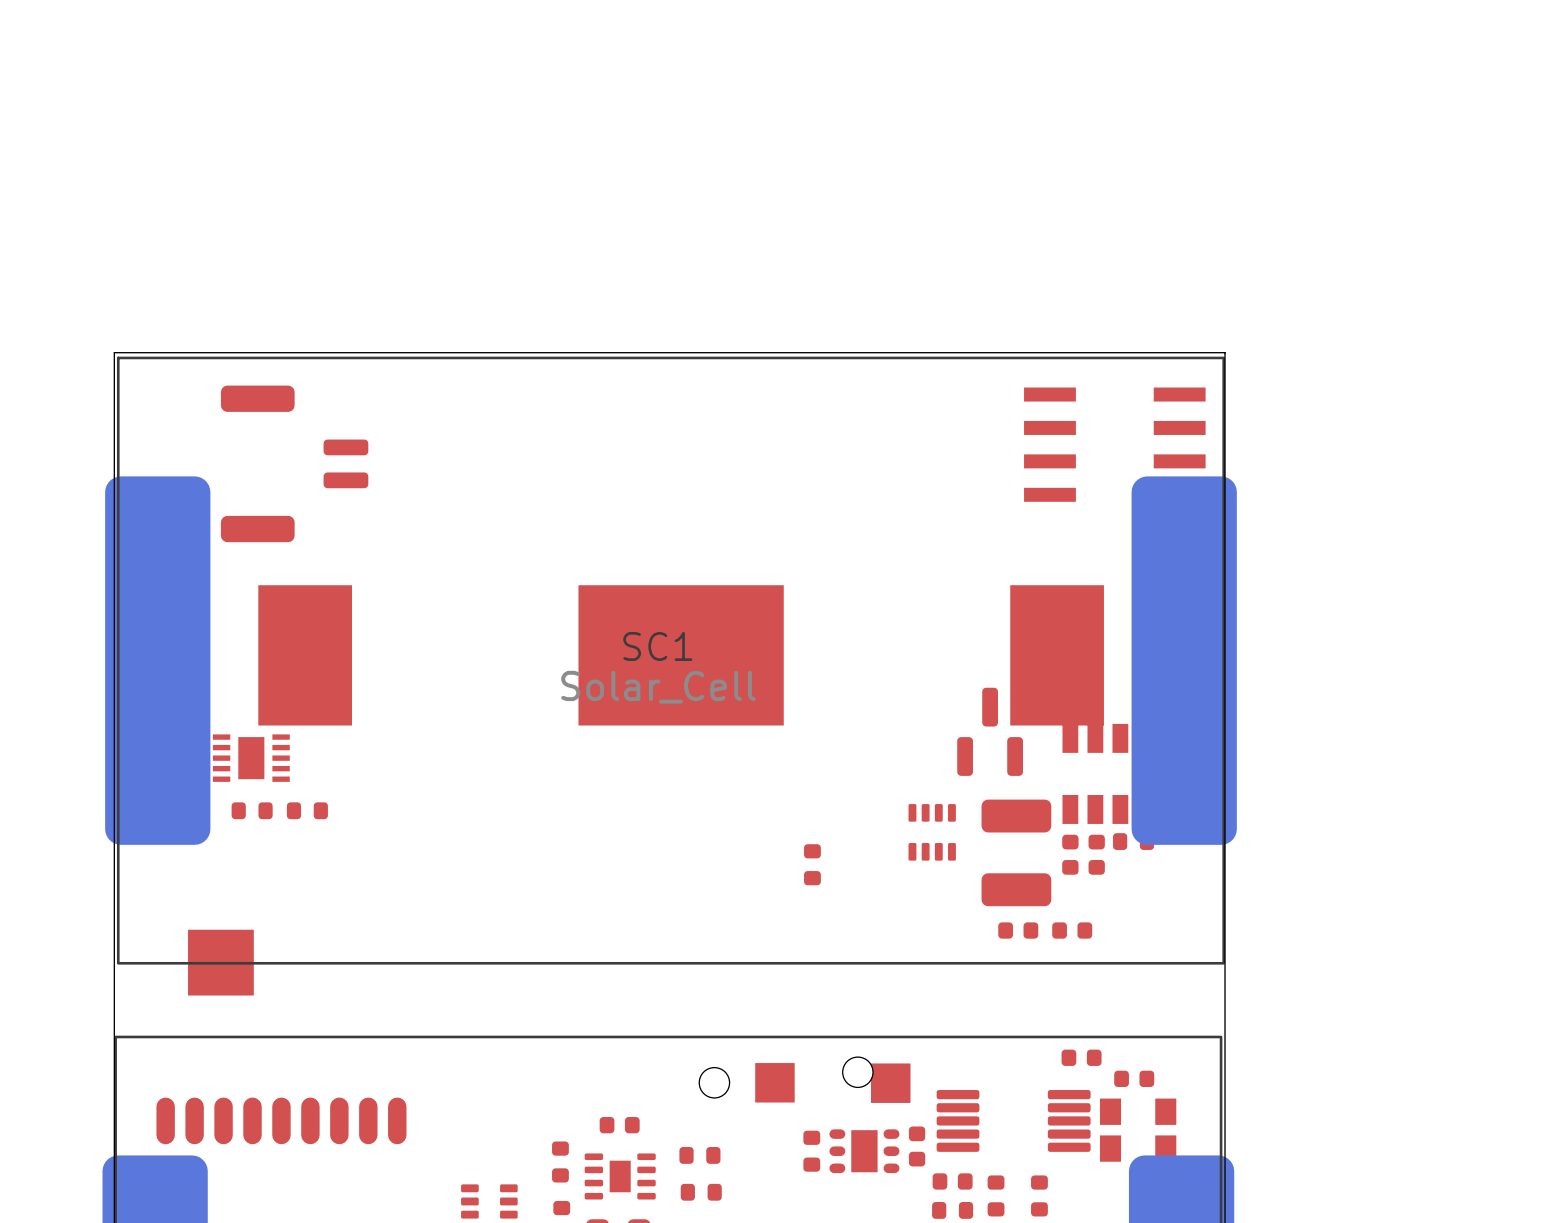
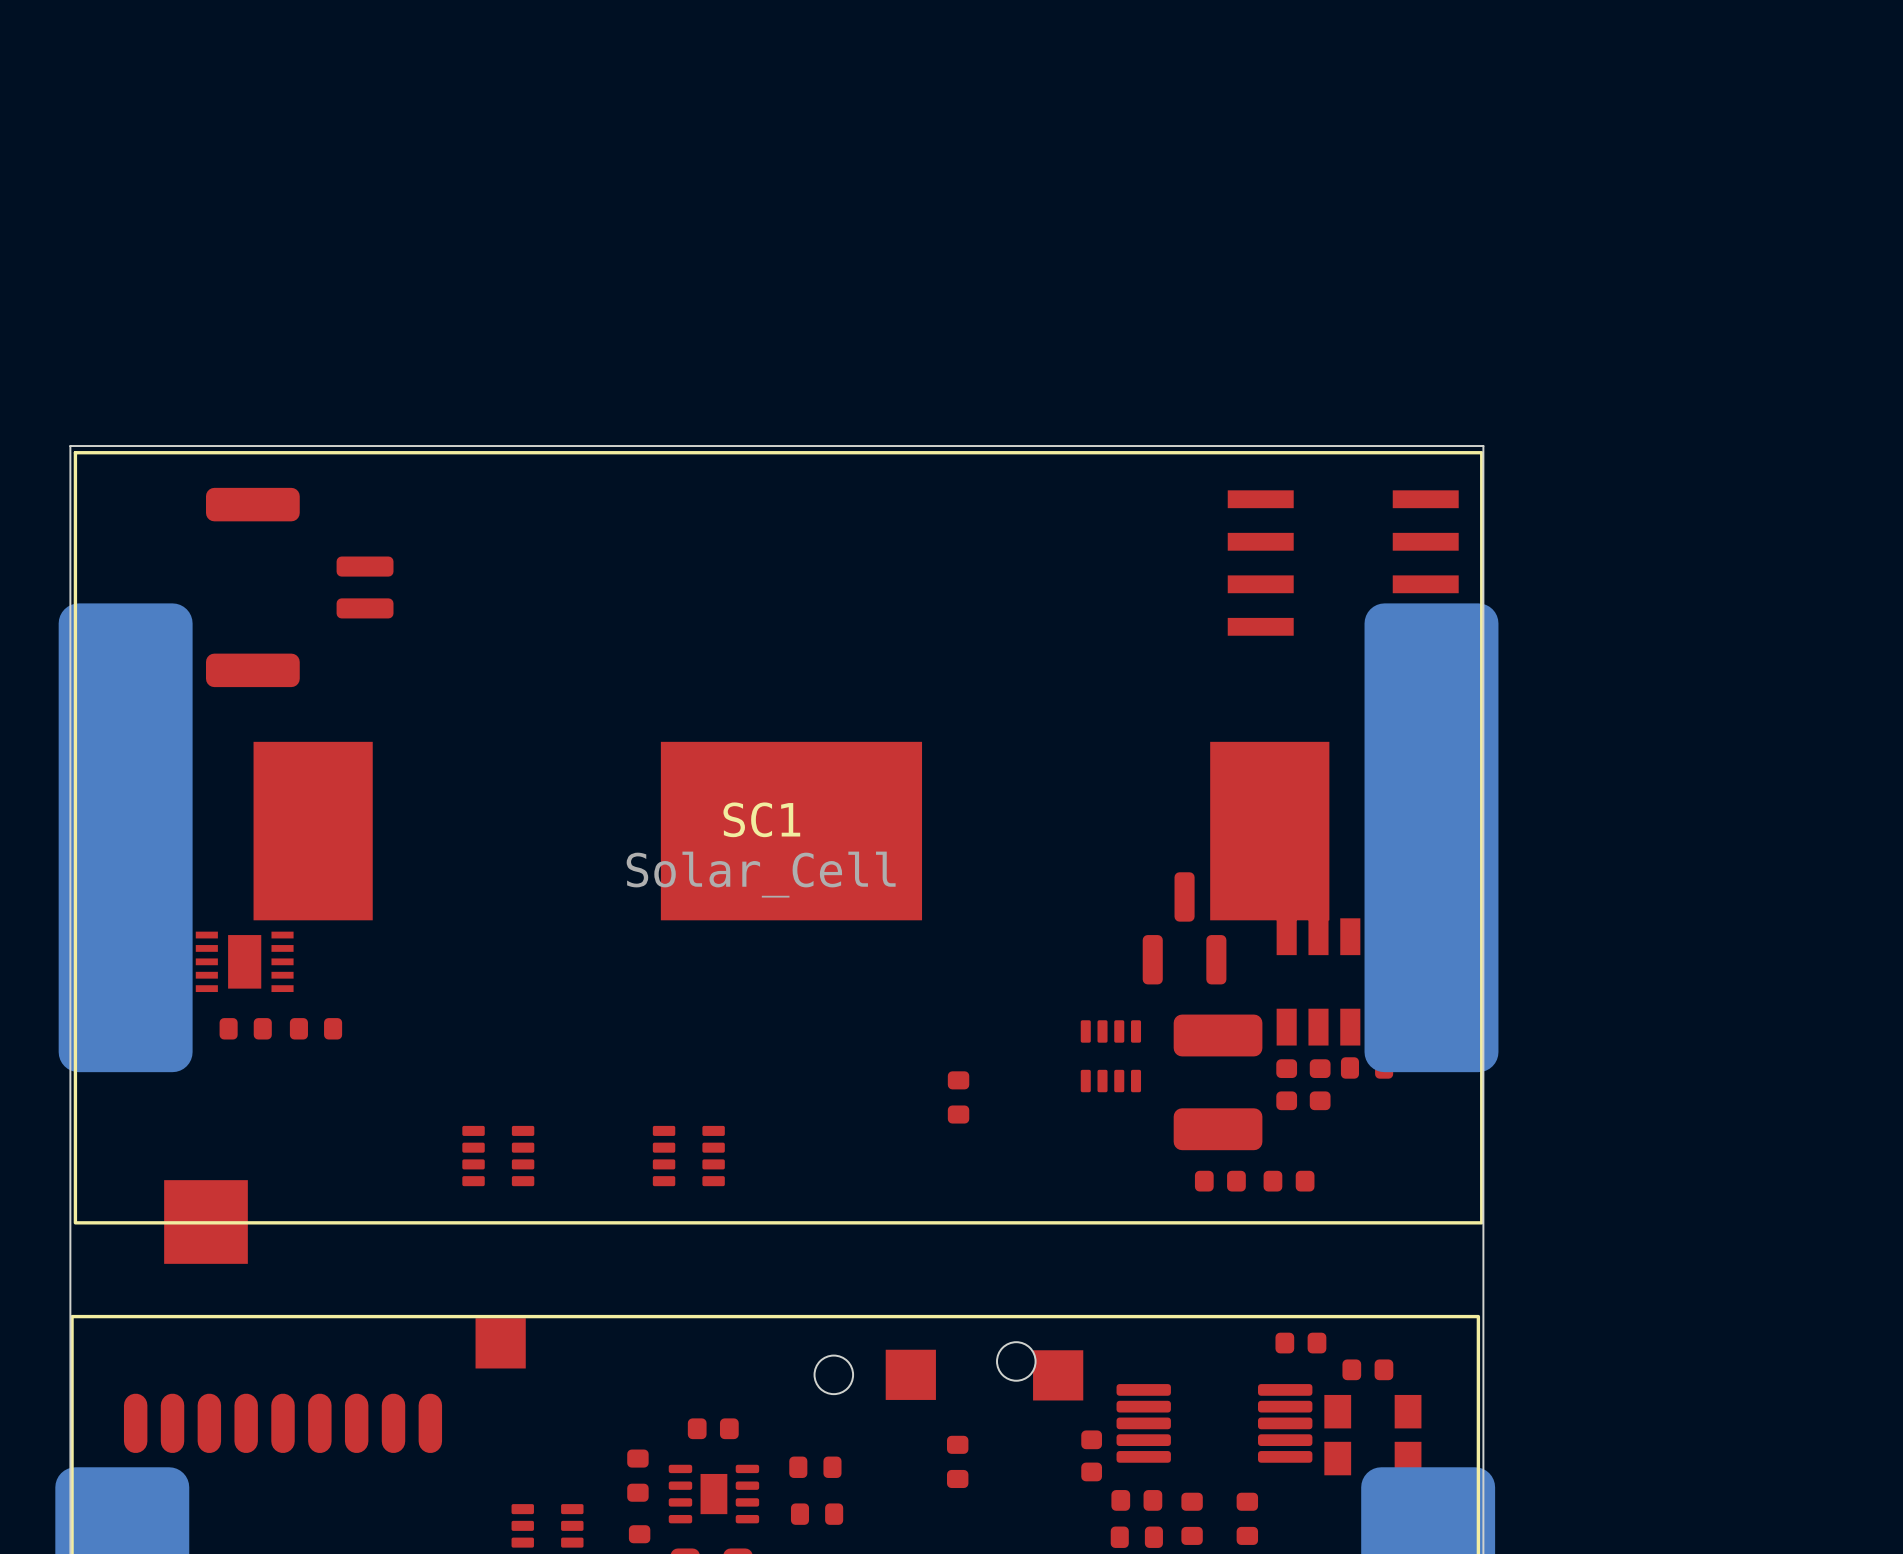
part: none -> (498, 1156)
part: none -> (688, 1156)
part: none -> (500, 1343)
part: (864, 1151) -> none

